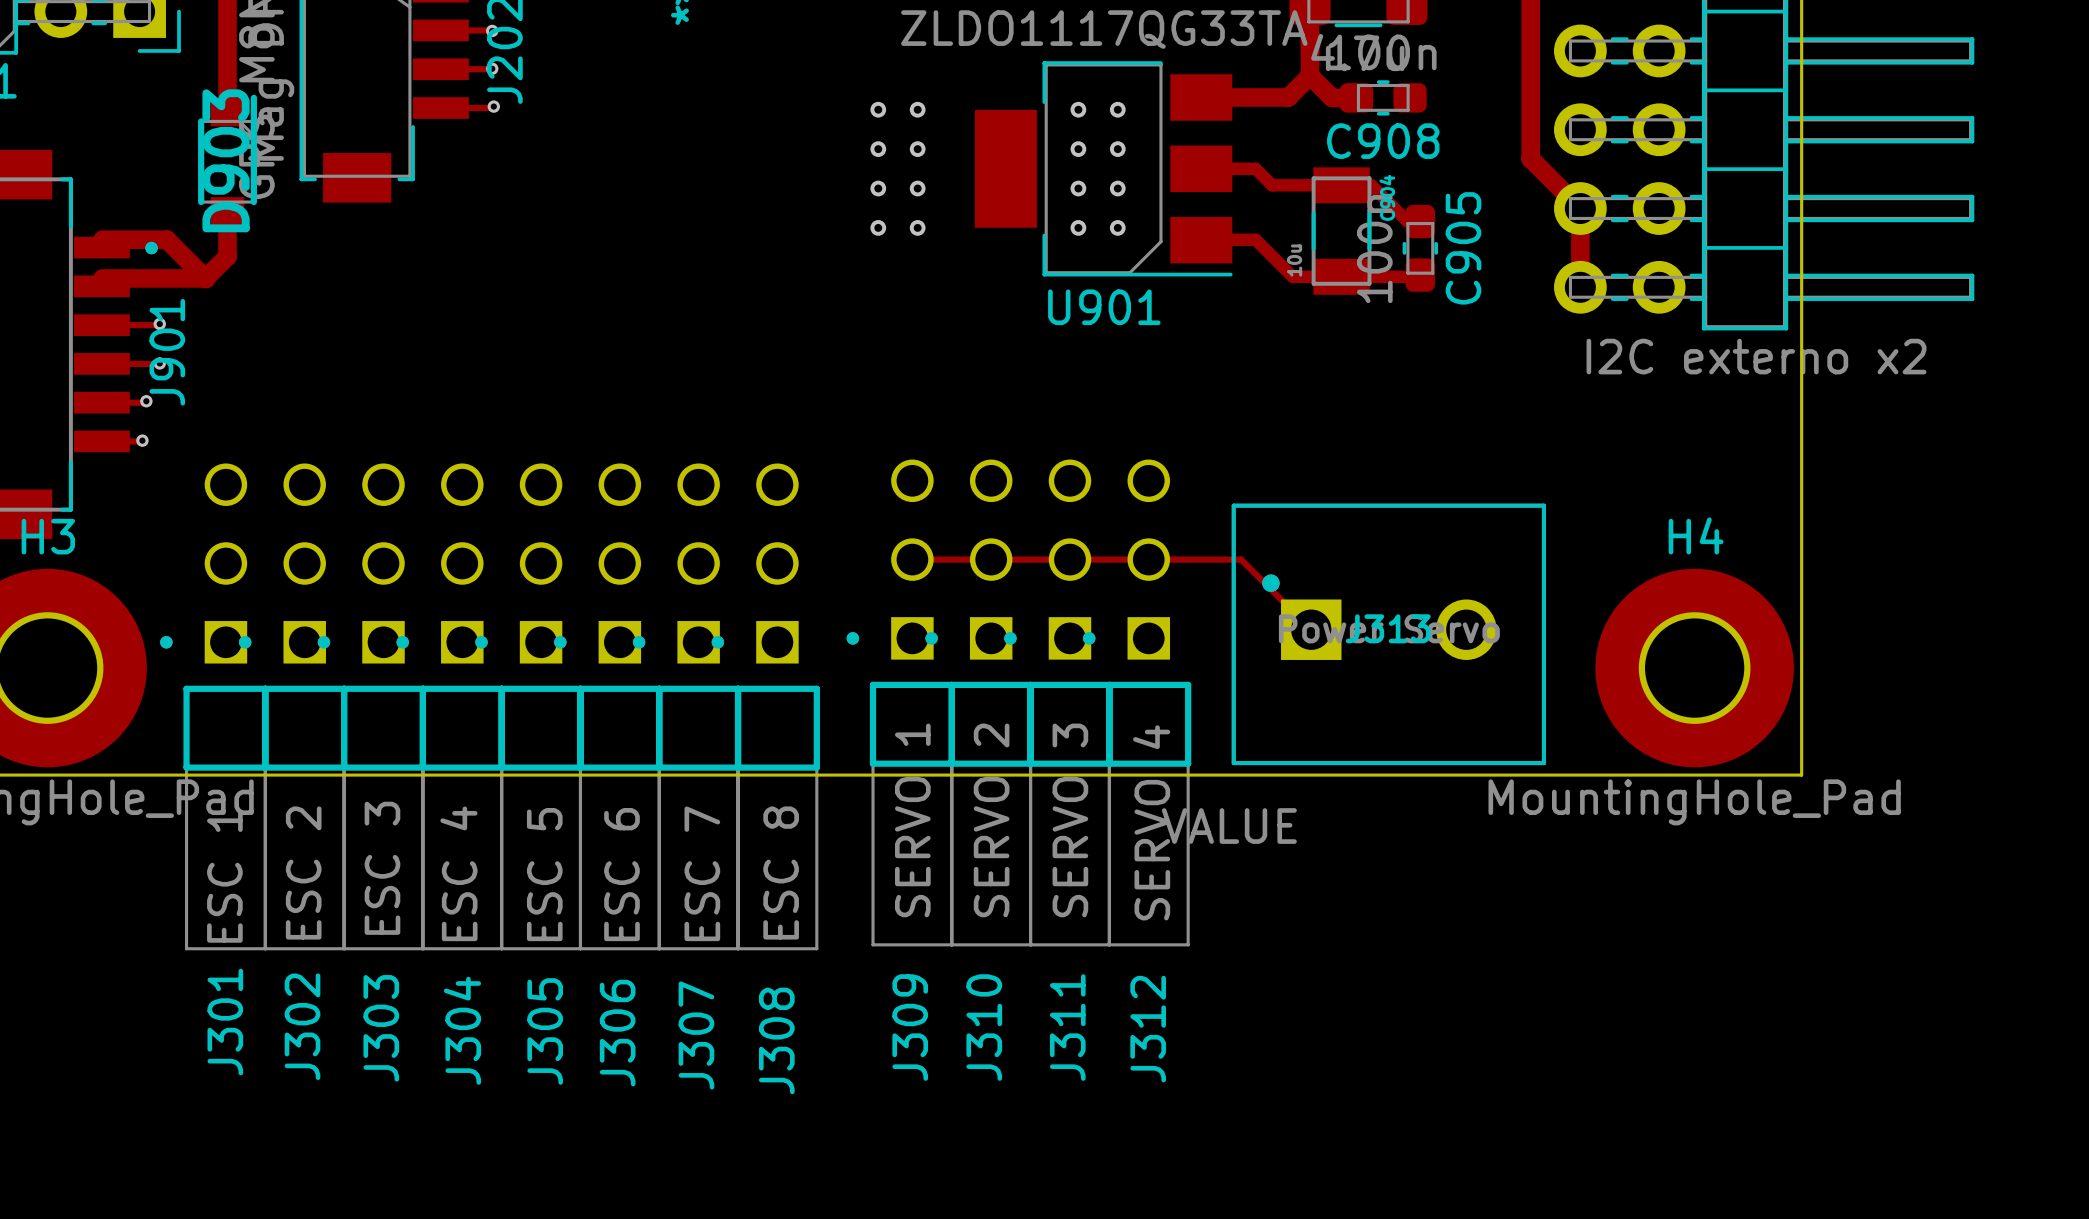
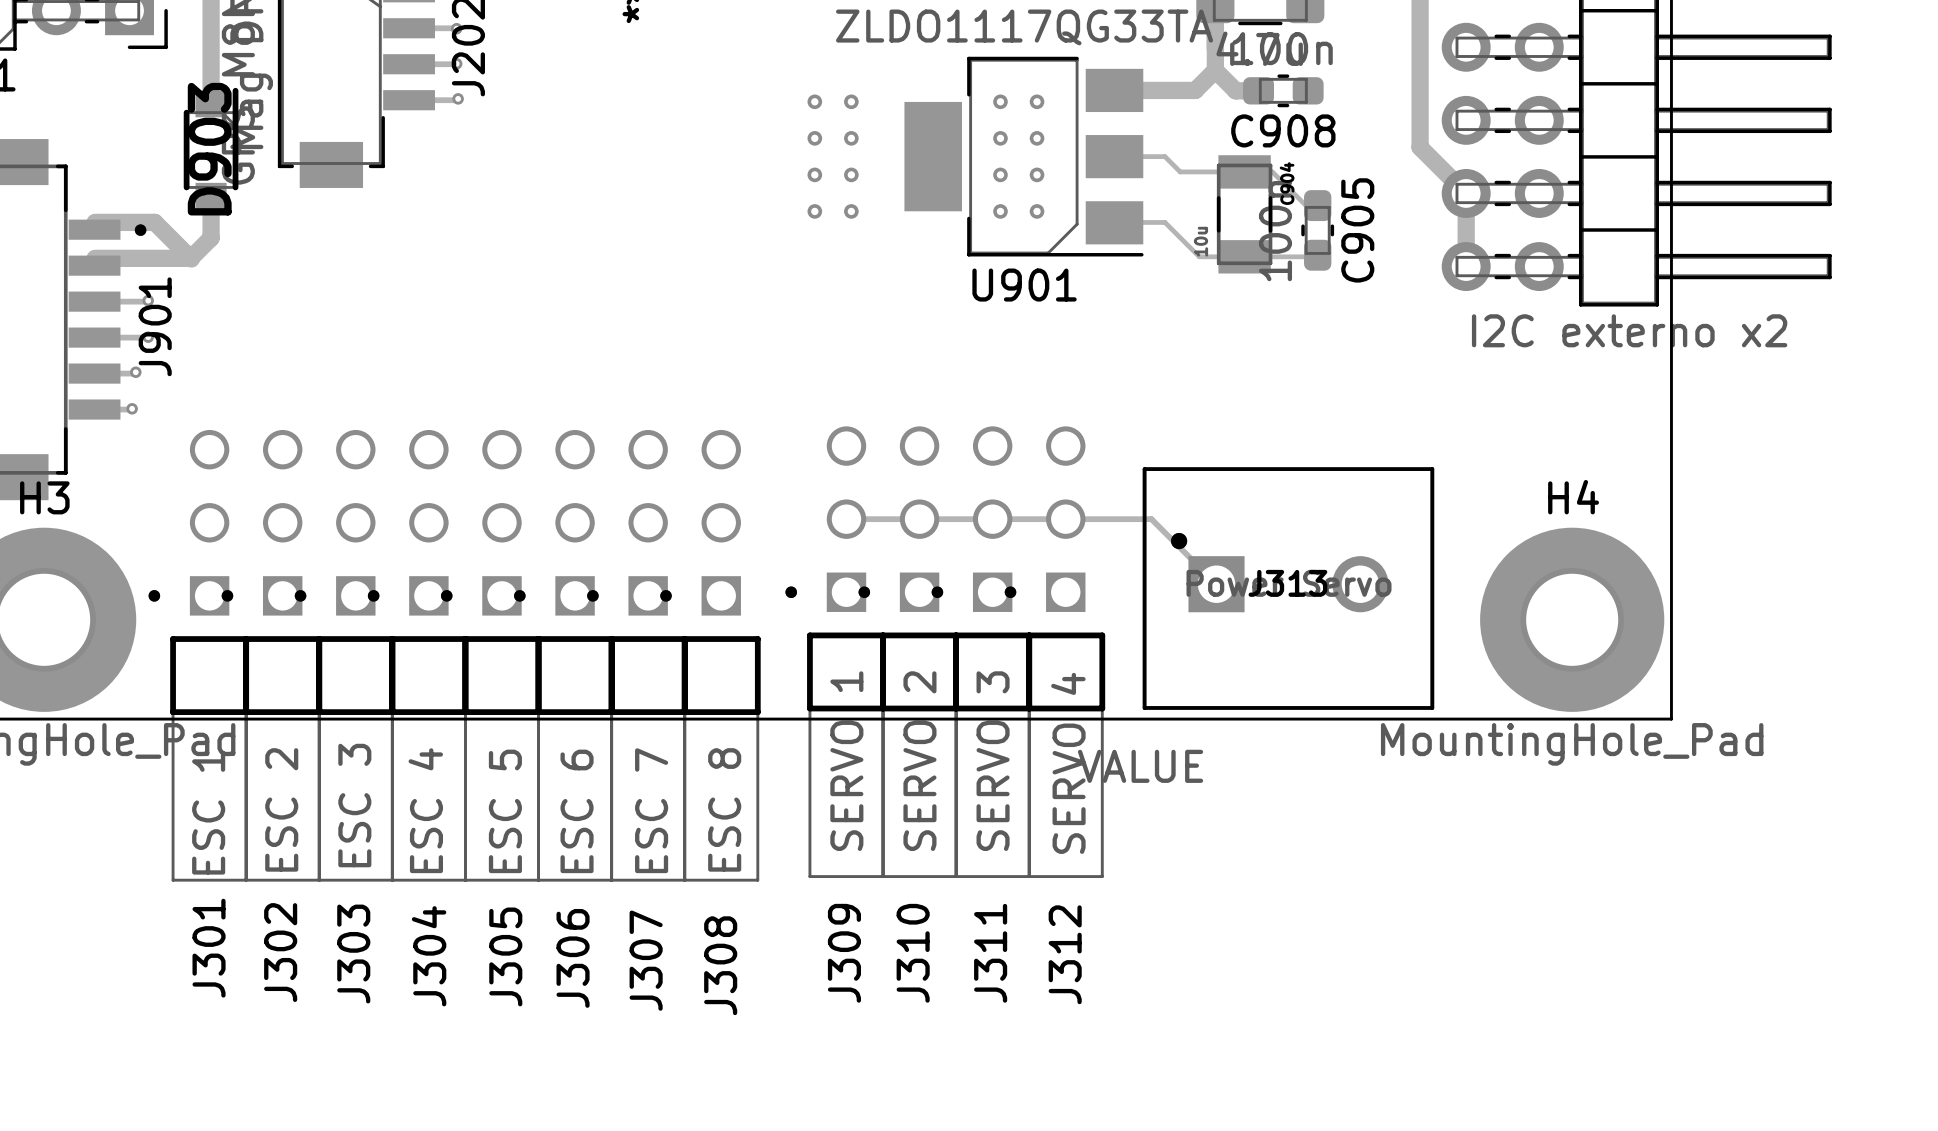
track width: thick (1201, 168) (1255, 168) (1272, 185) (1371, 185) (1407, 221) -> thin (1114, 156) (1164, 156) (1180, 171) (1272, 171) (1306, 205)
track width: thick (1201, 239) (1255, 239) (1292, 276) (1418, 276) -> thin (1114, 222) (1164, 222) (1199, 256) (1316, 256)

